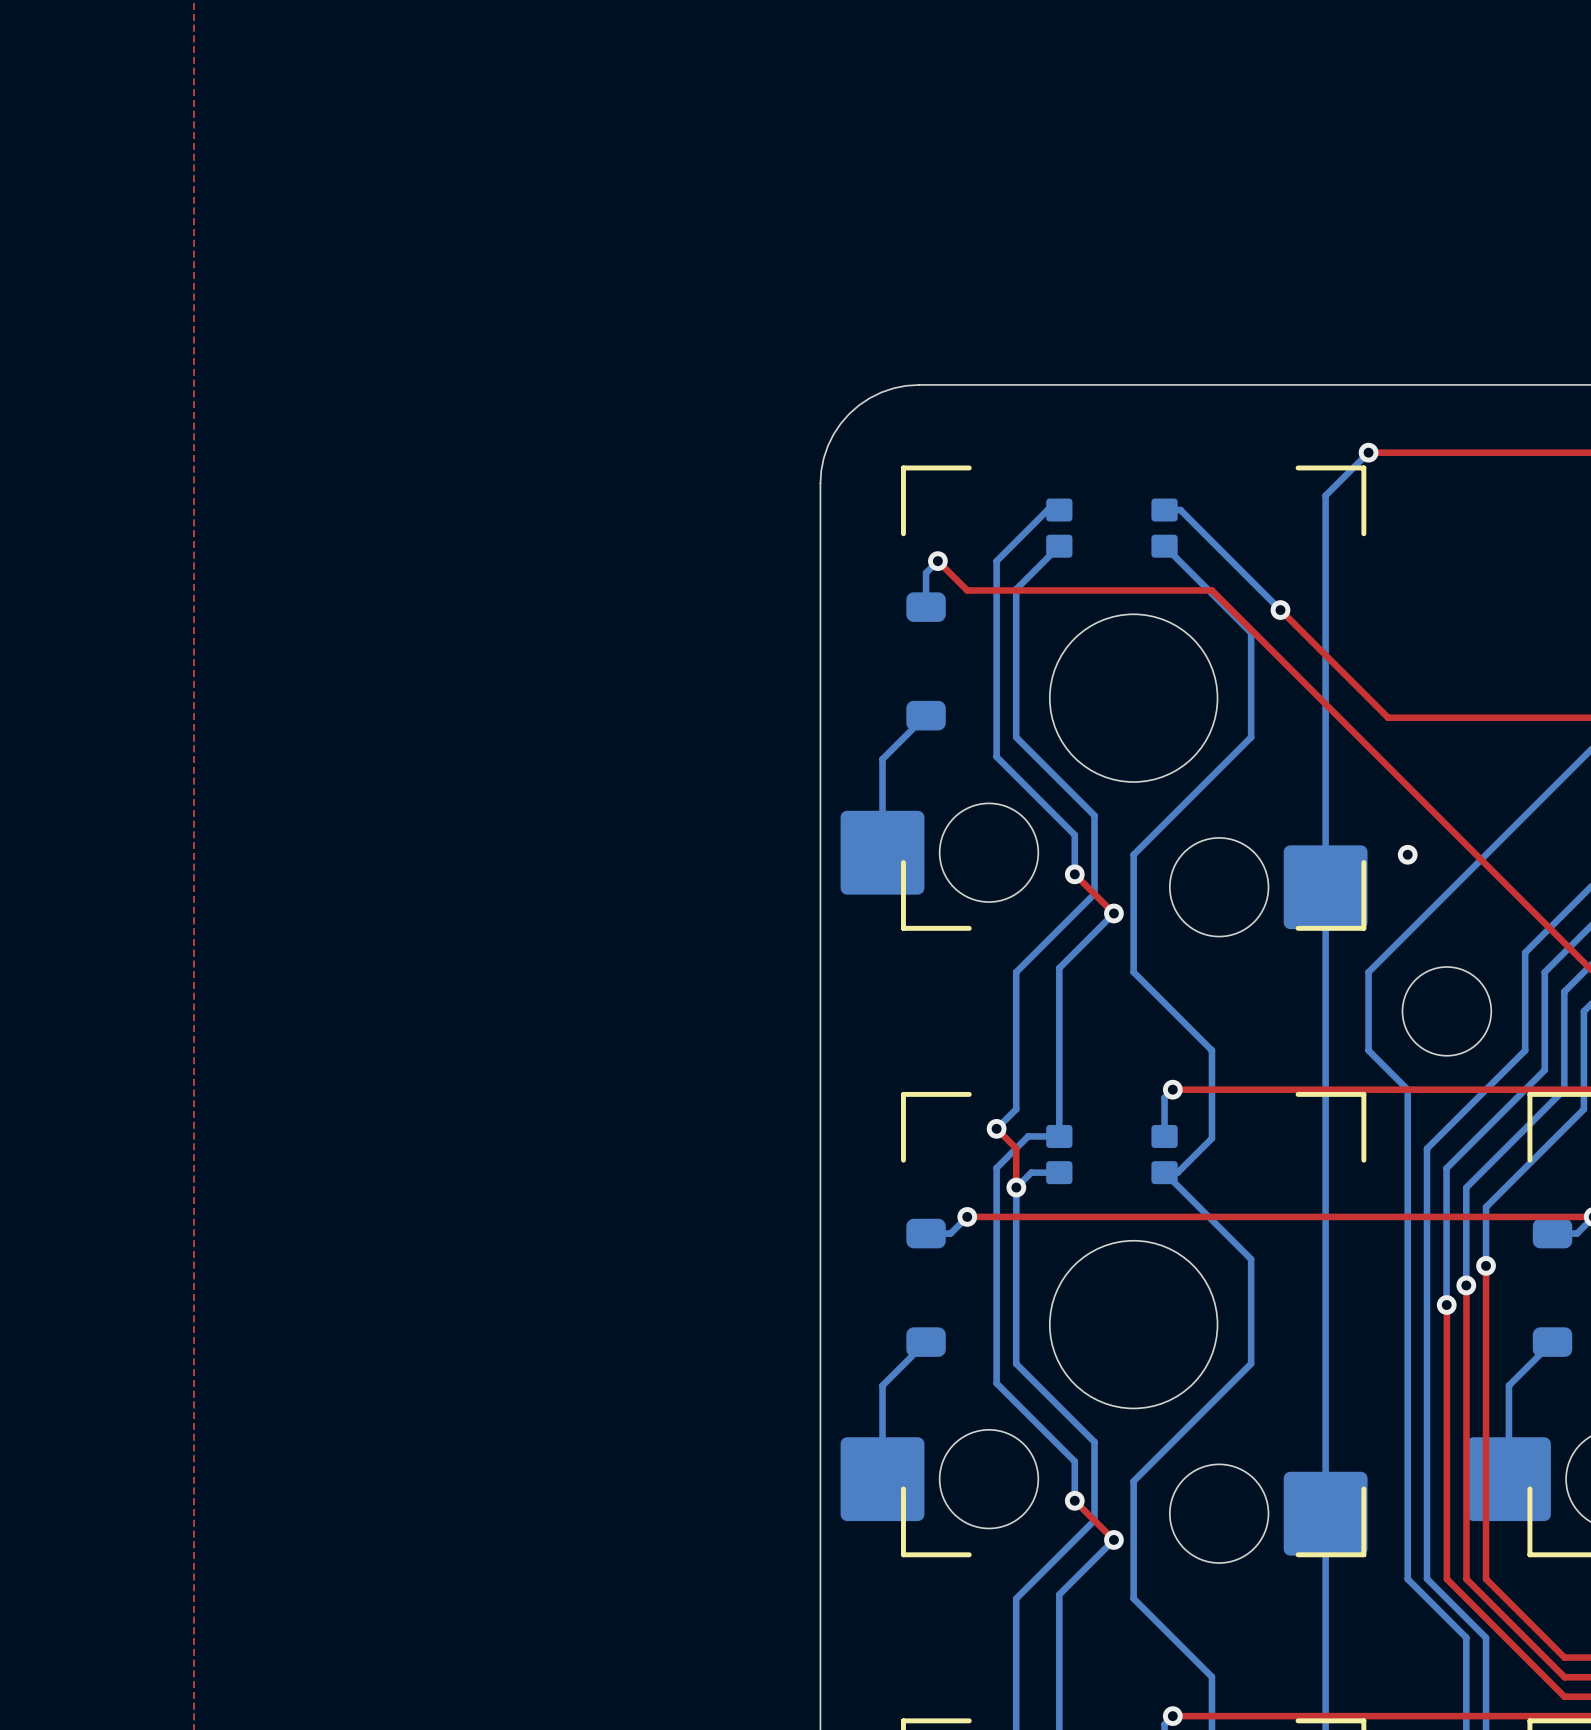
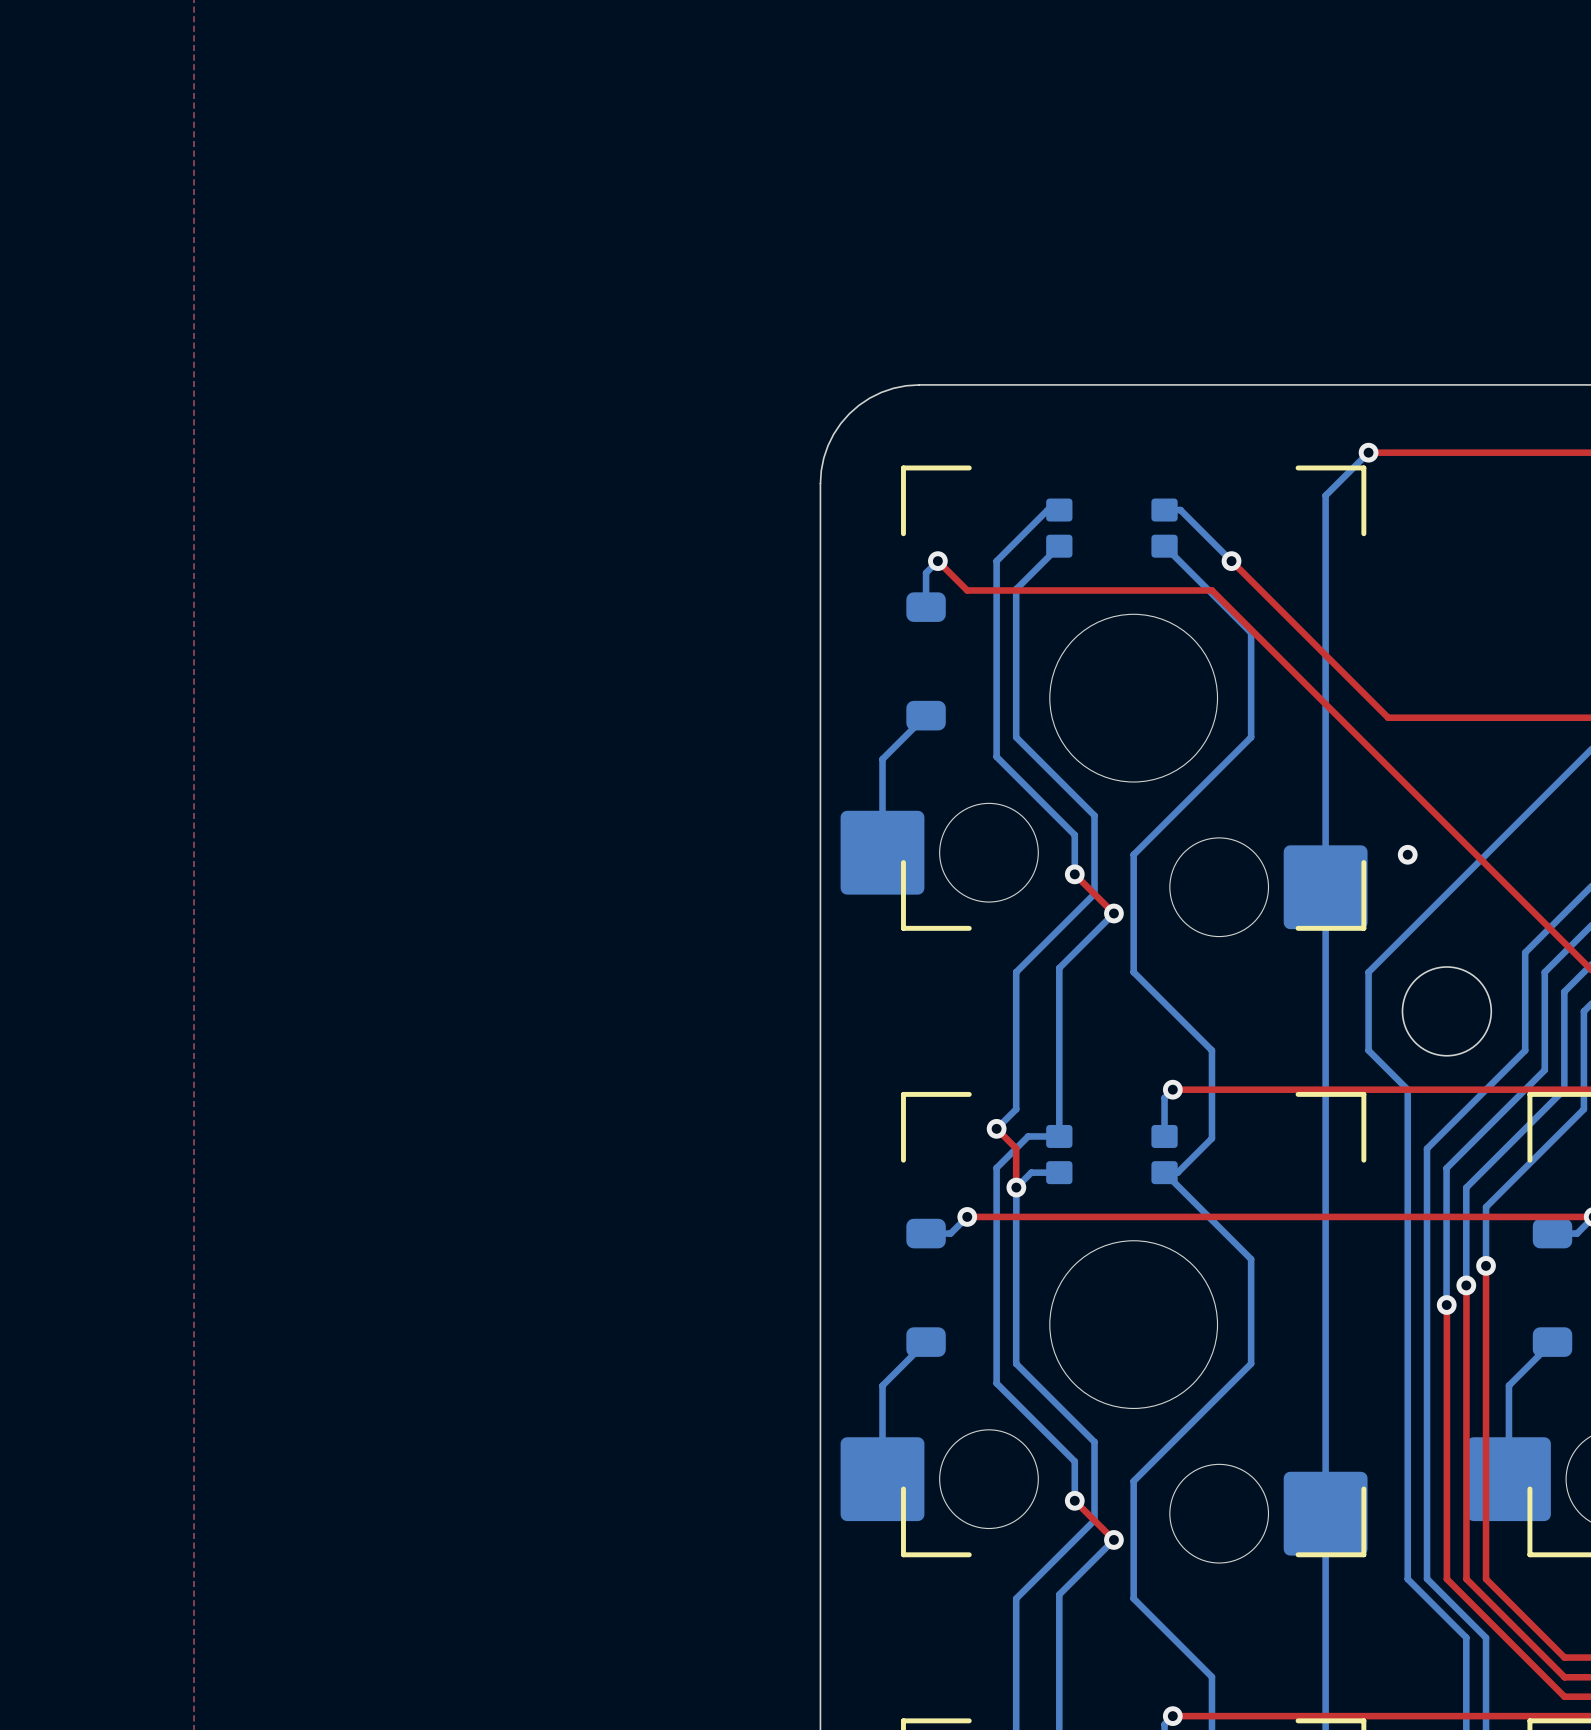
top track: none -> (1231, 561) (1280, 610)
bottom track: (1231, 561) (1280, 610) -> none
via position: (1280, 610) -> (1231, 561)

